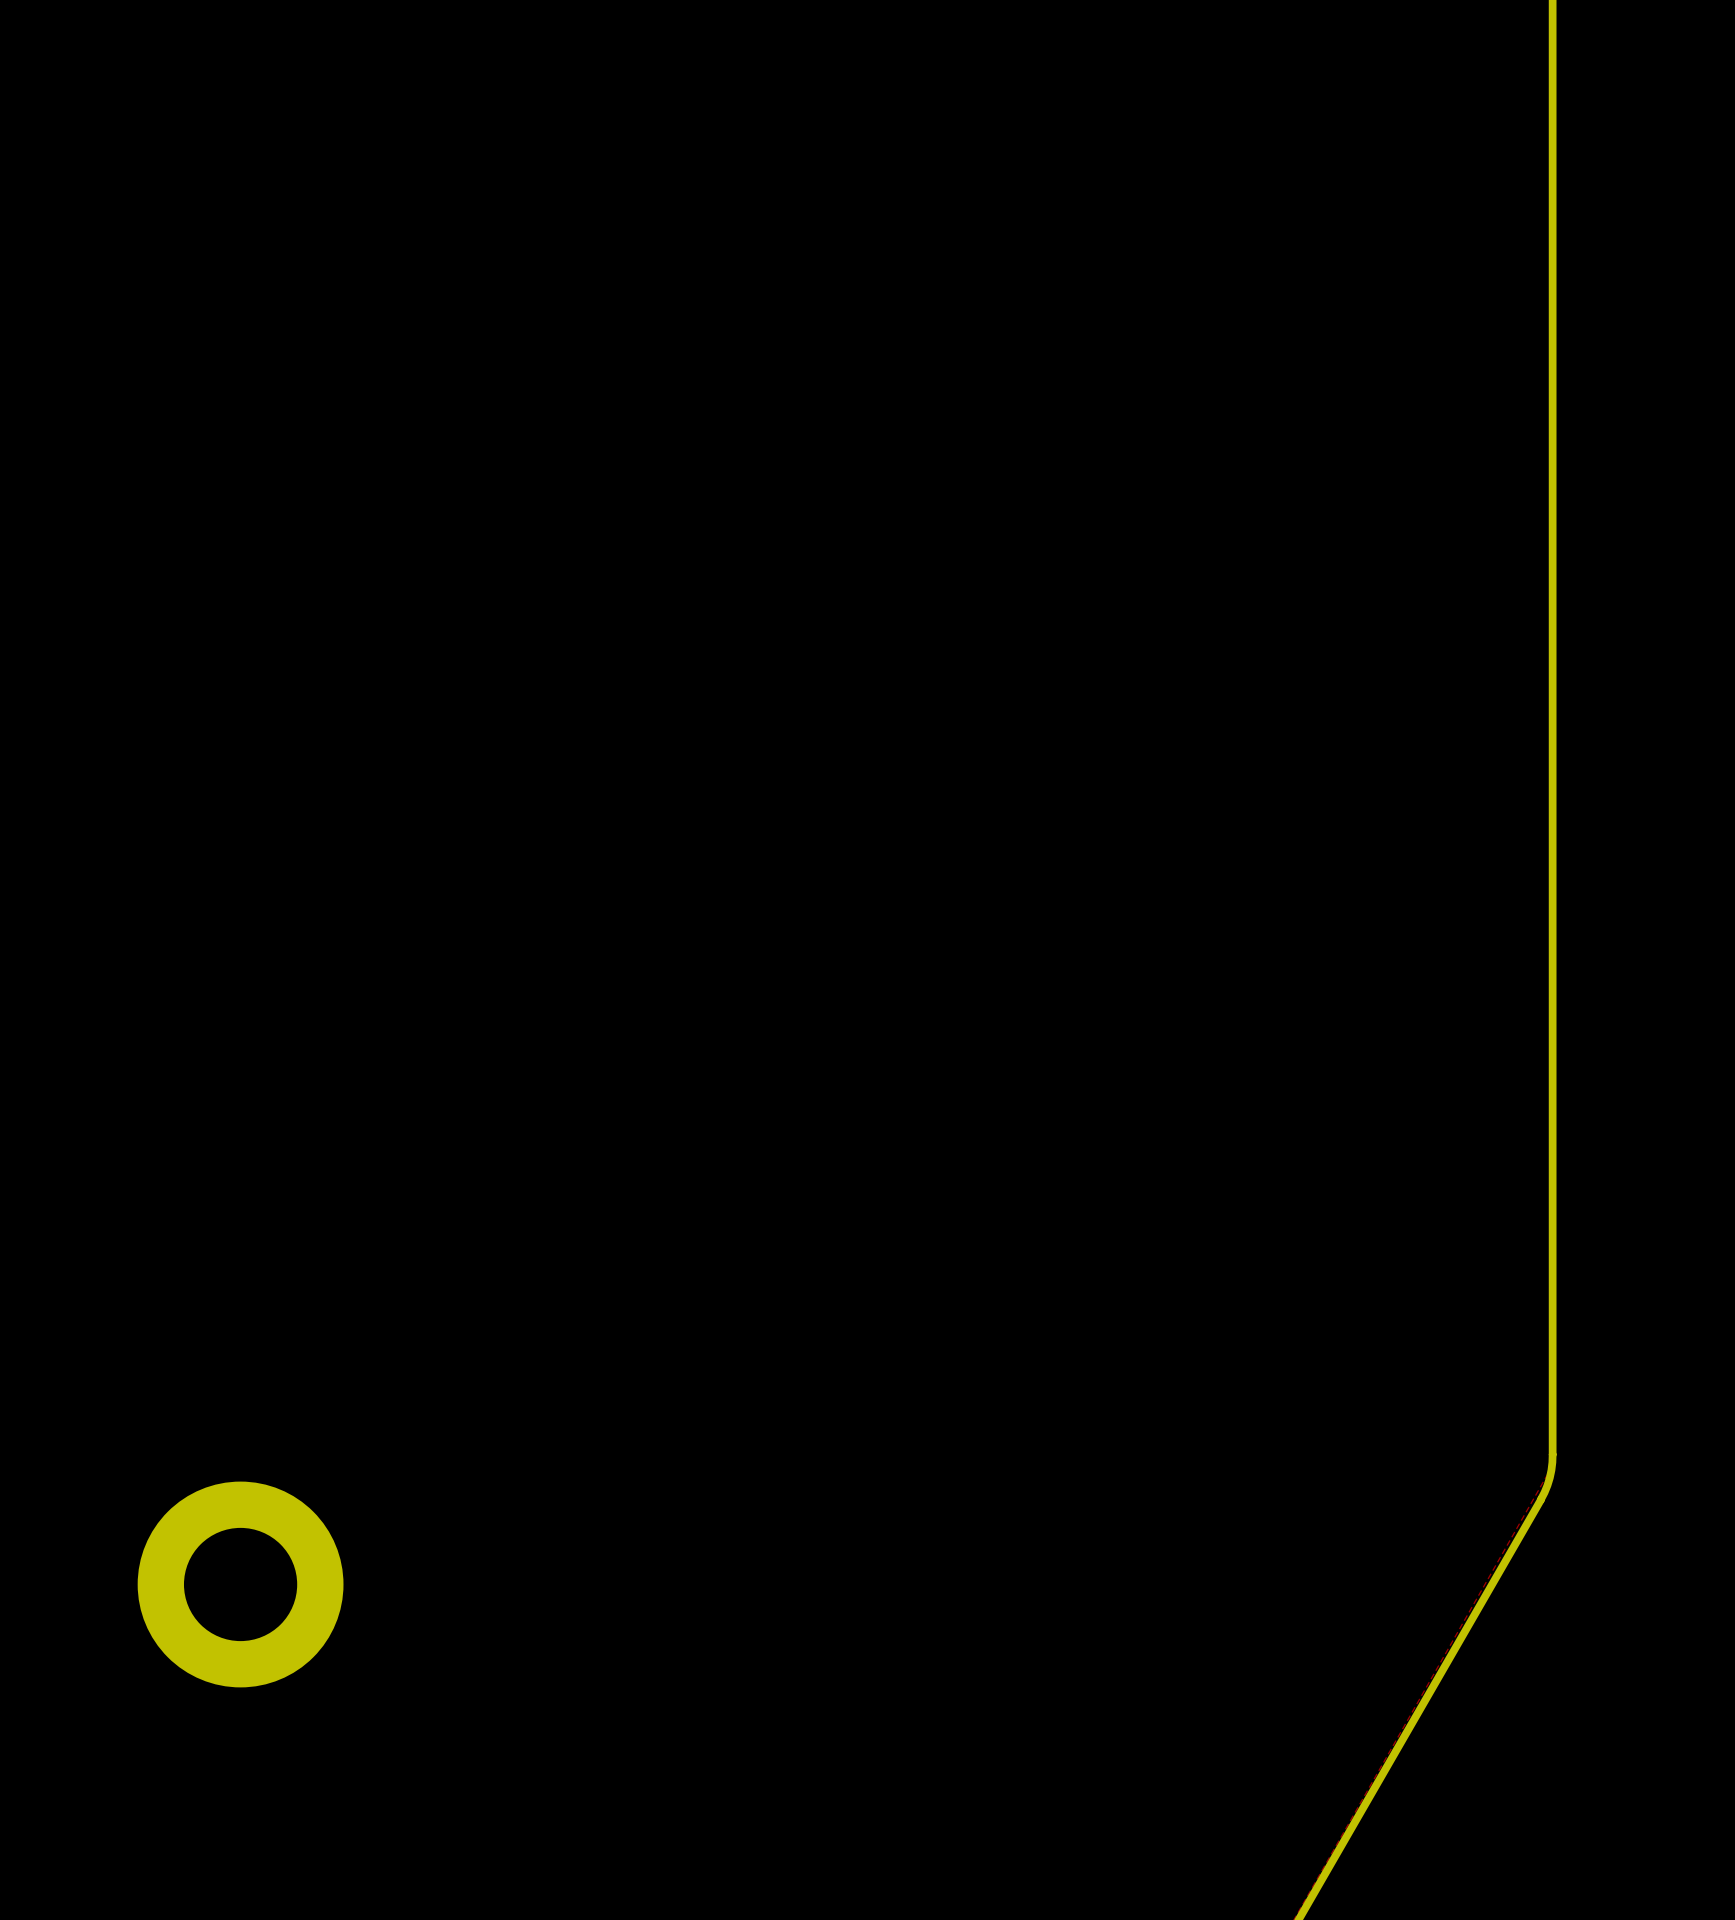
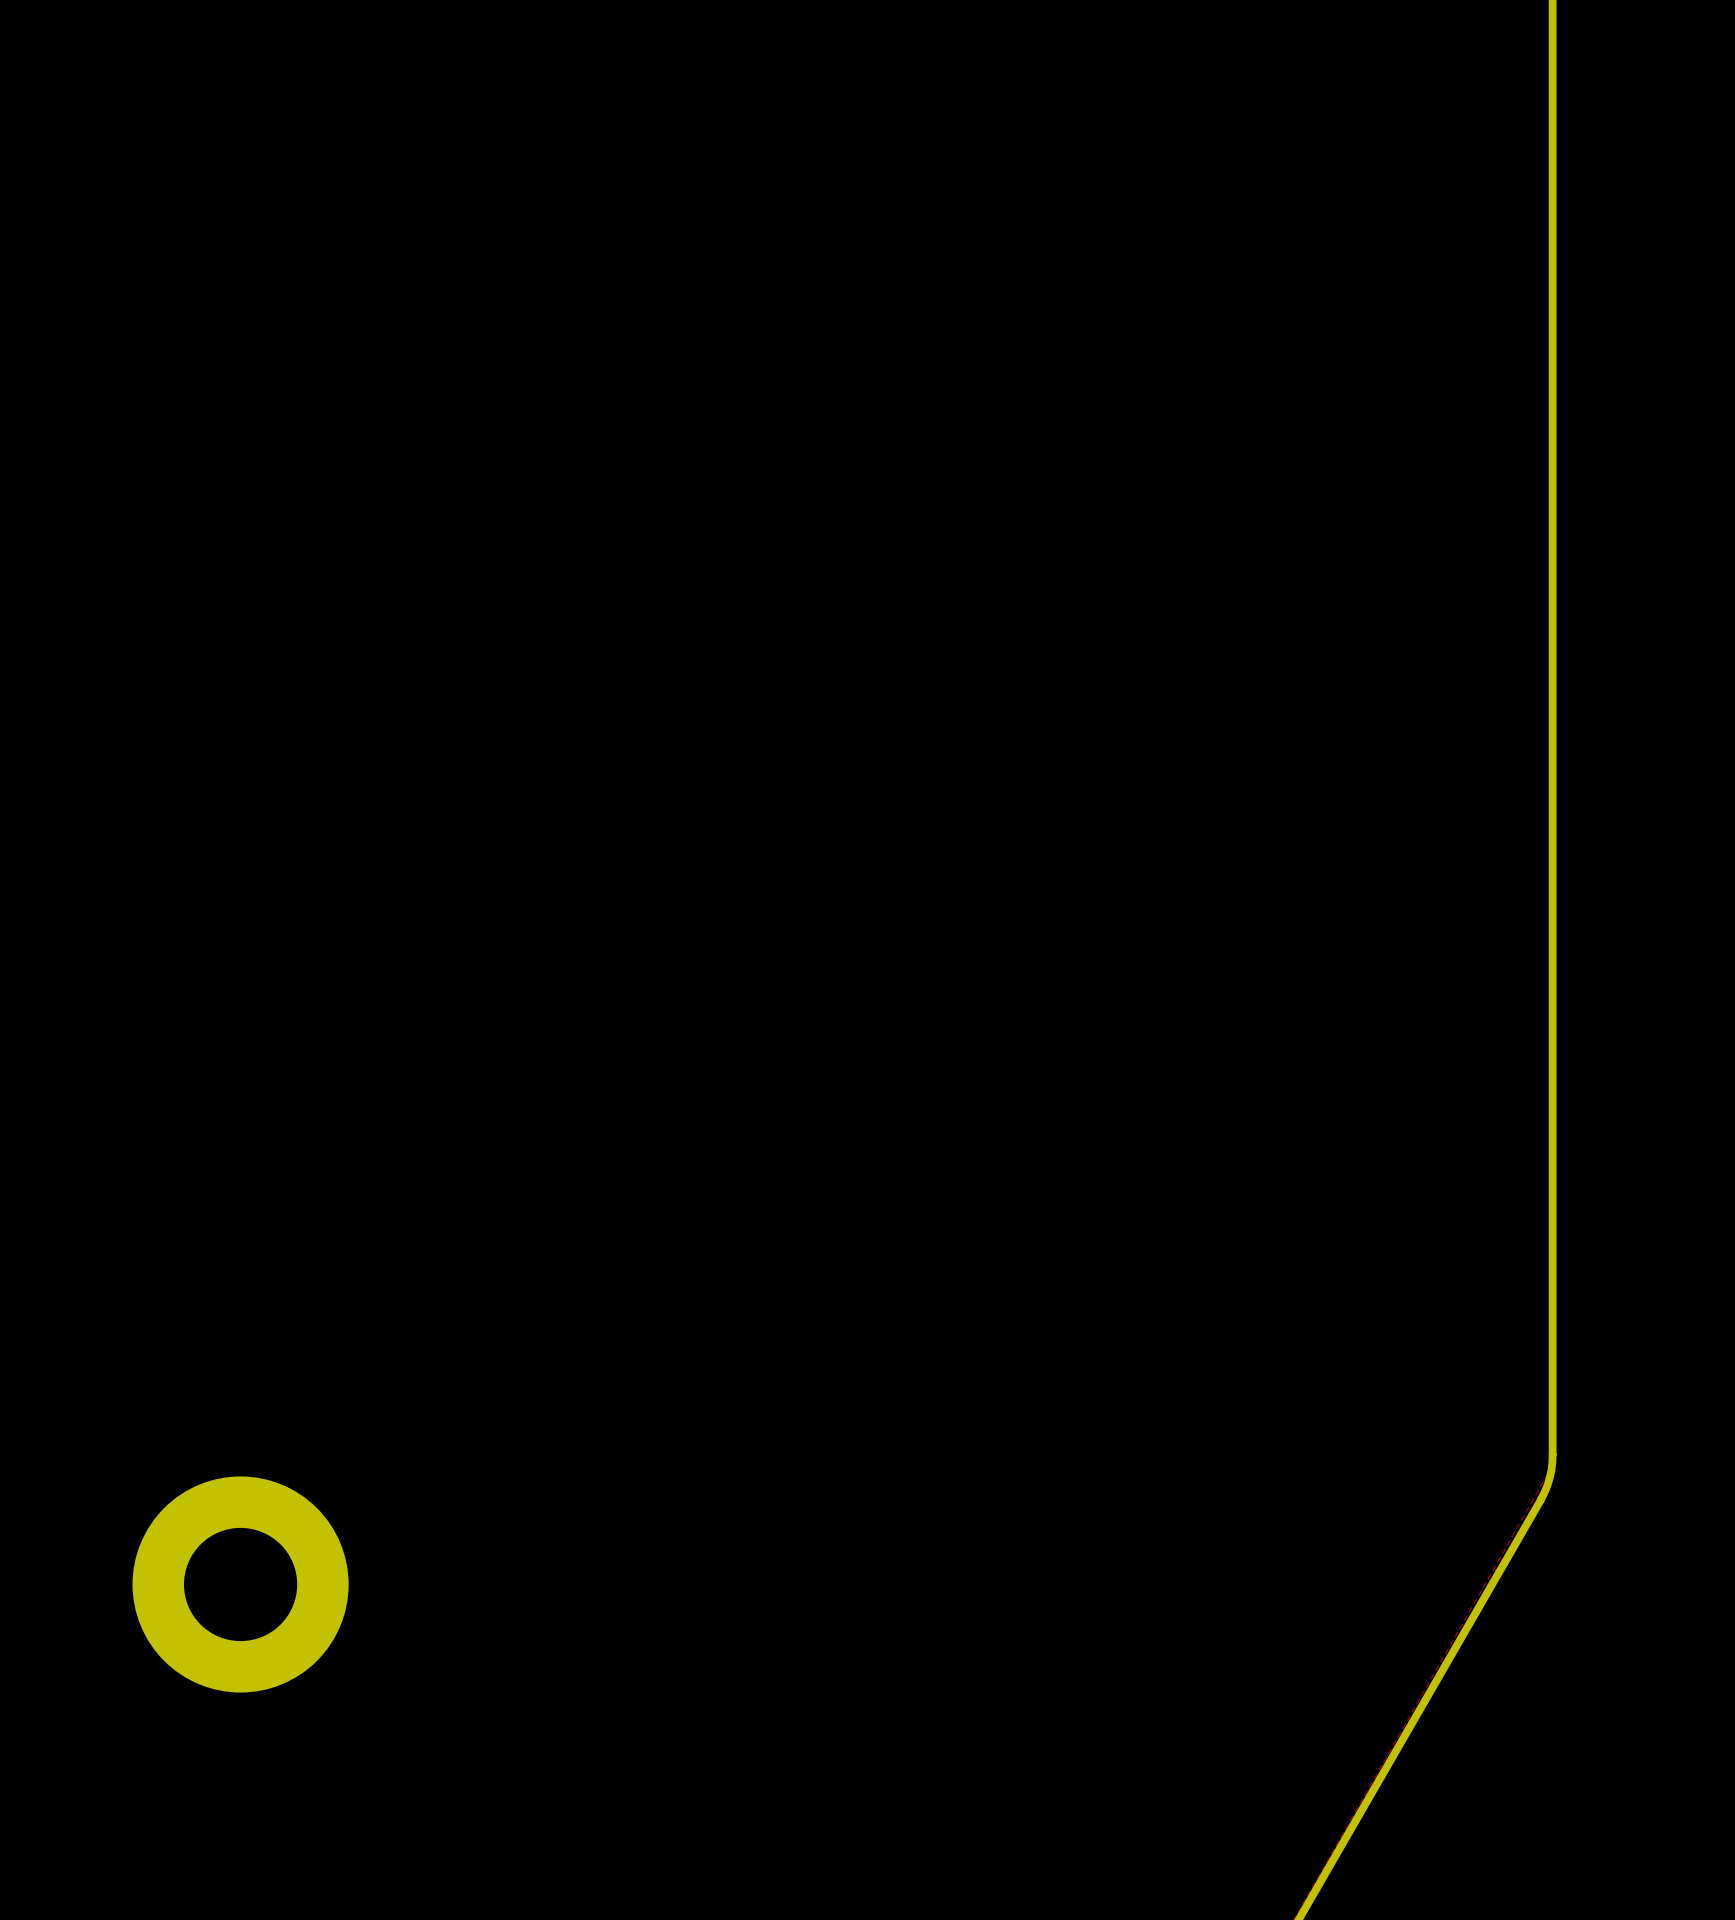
part footprint: [137, 1481, 344, 1688] -> [132, 1476, 349, 1693]

